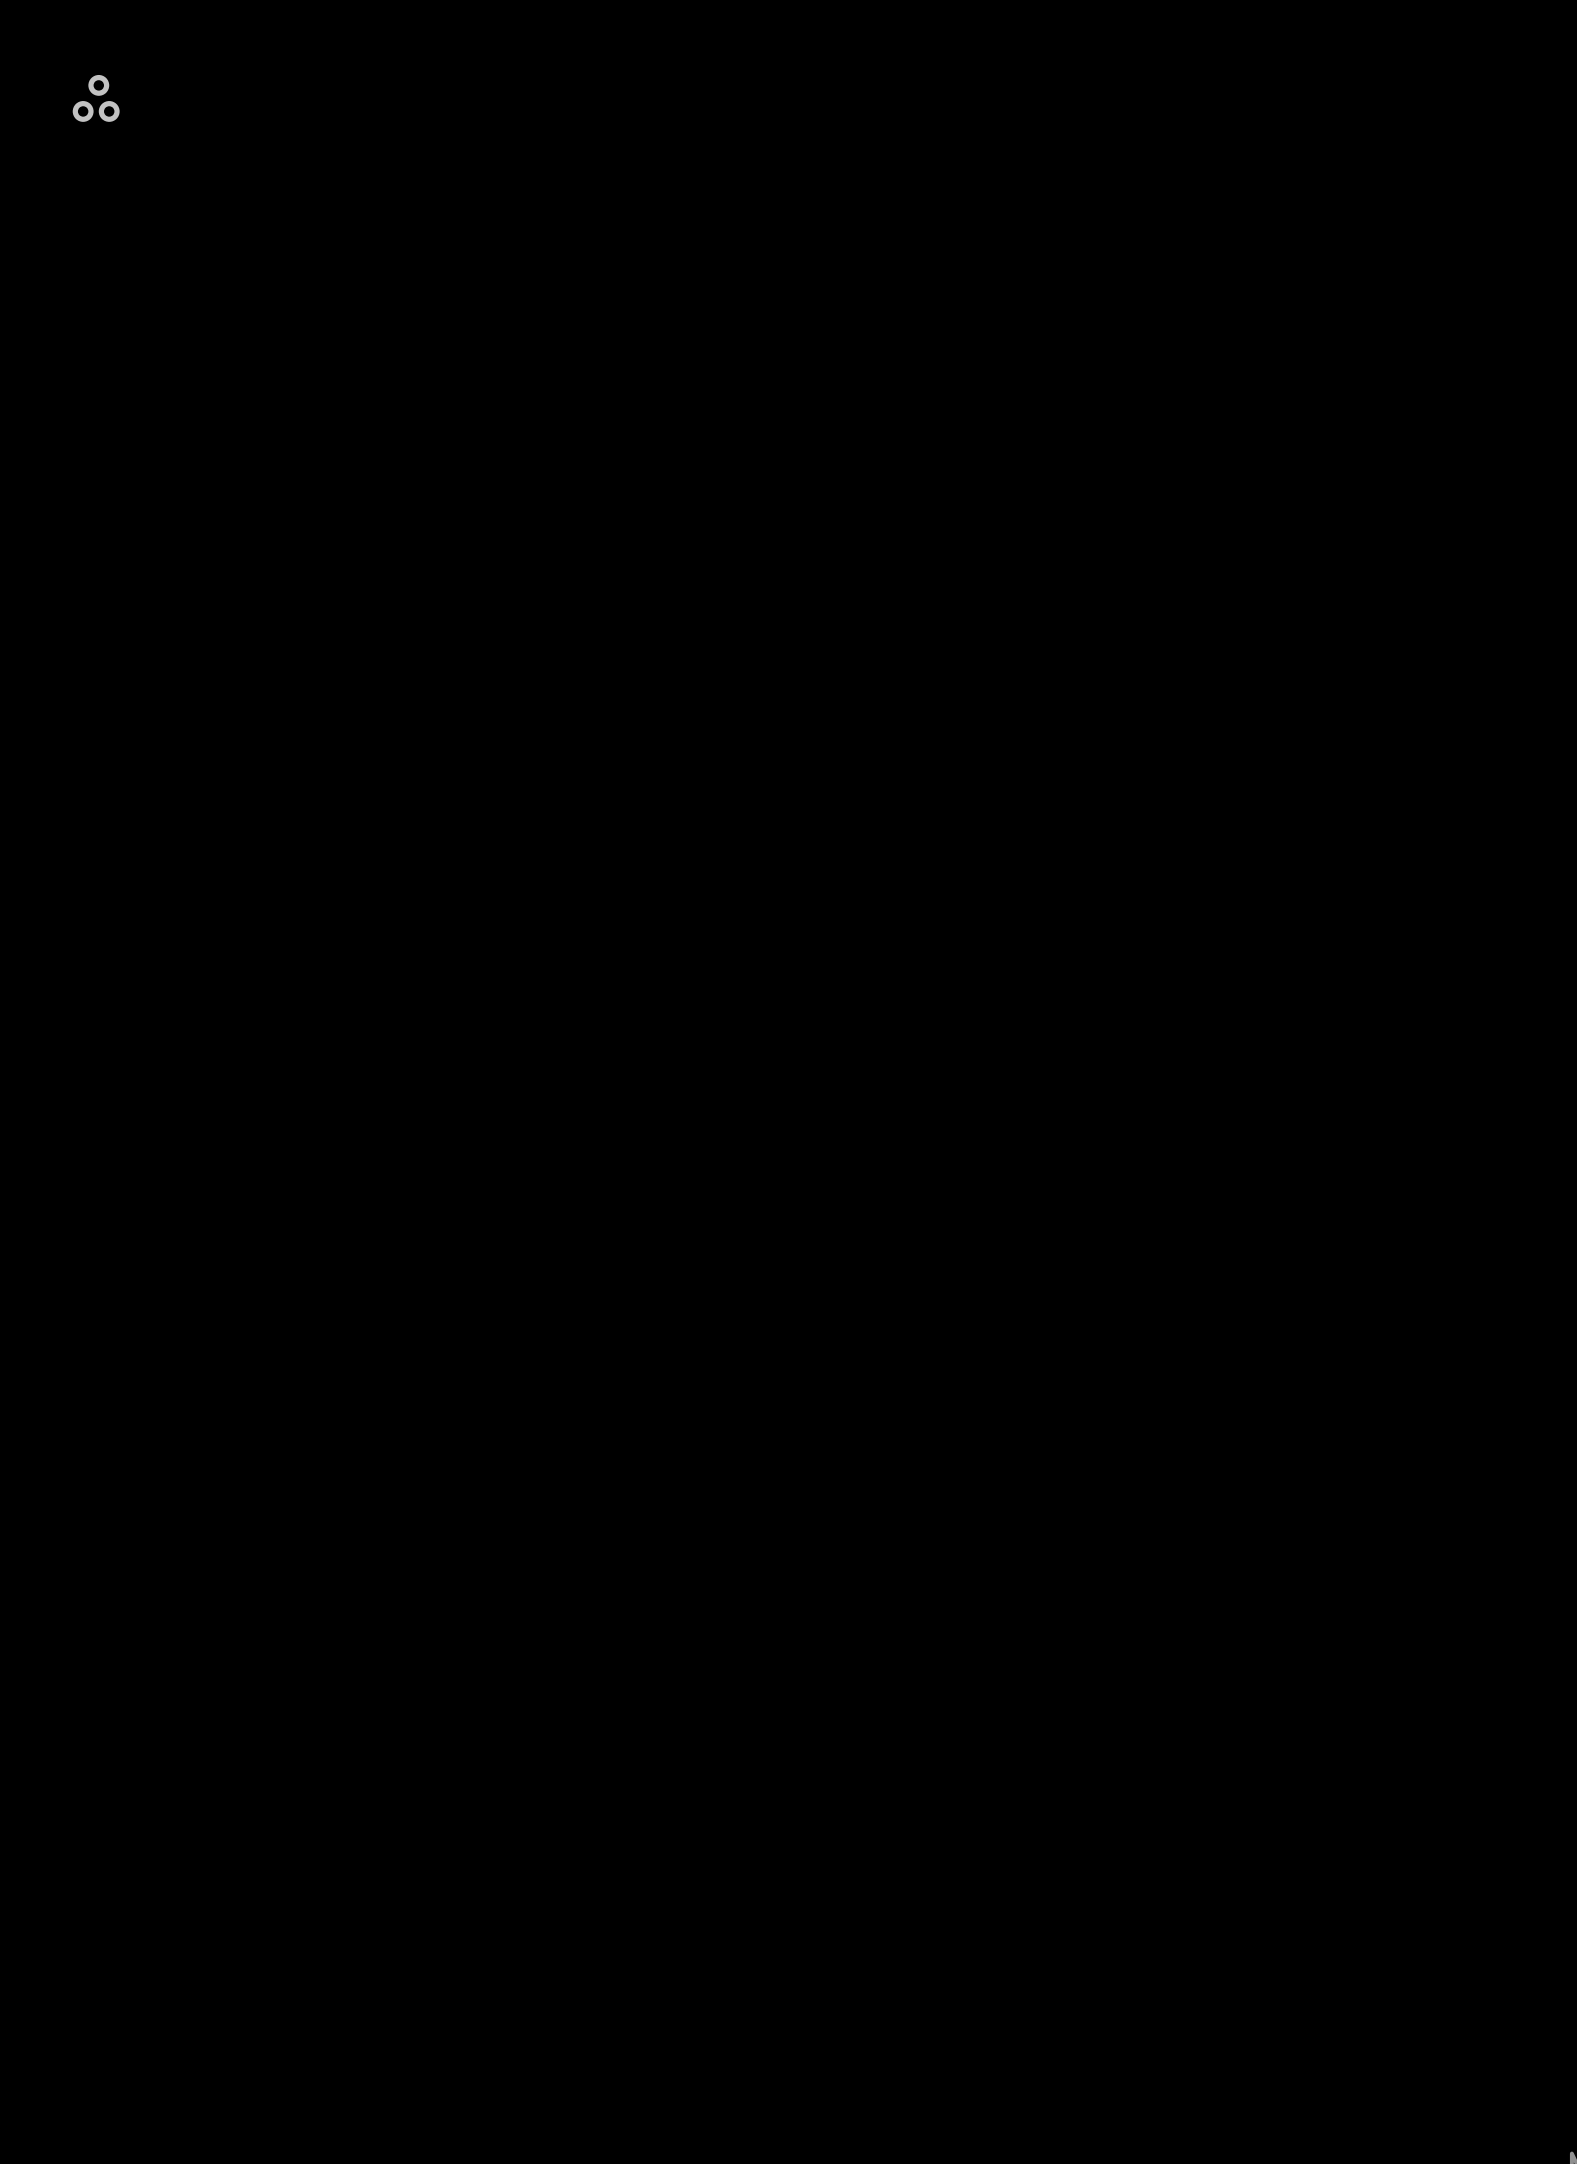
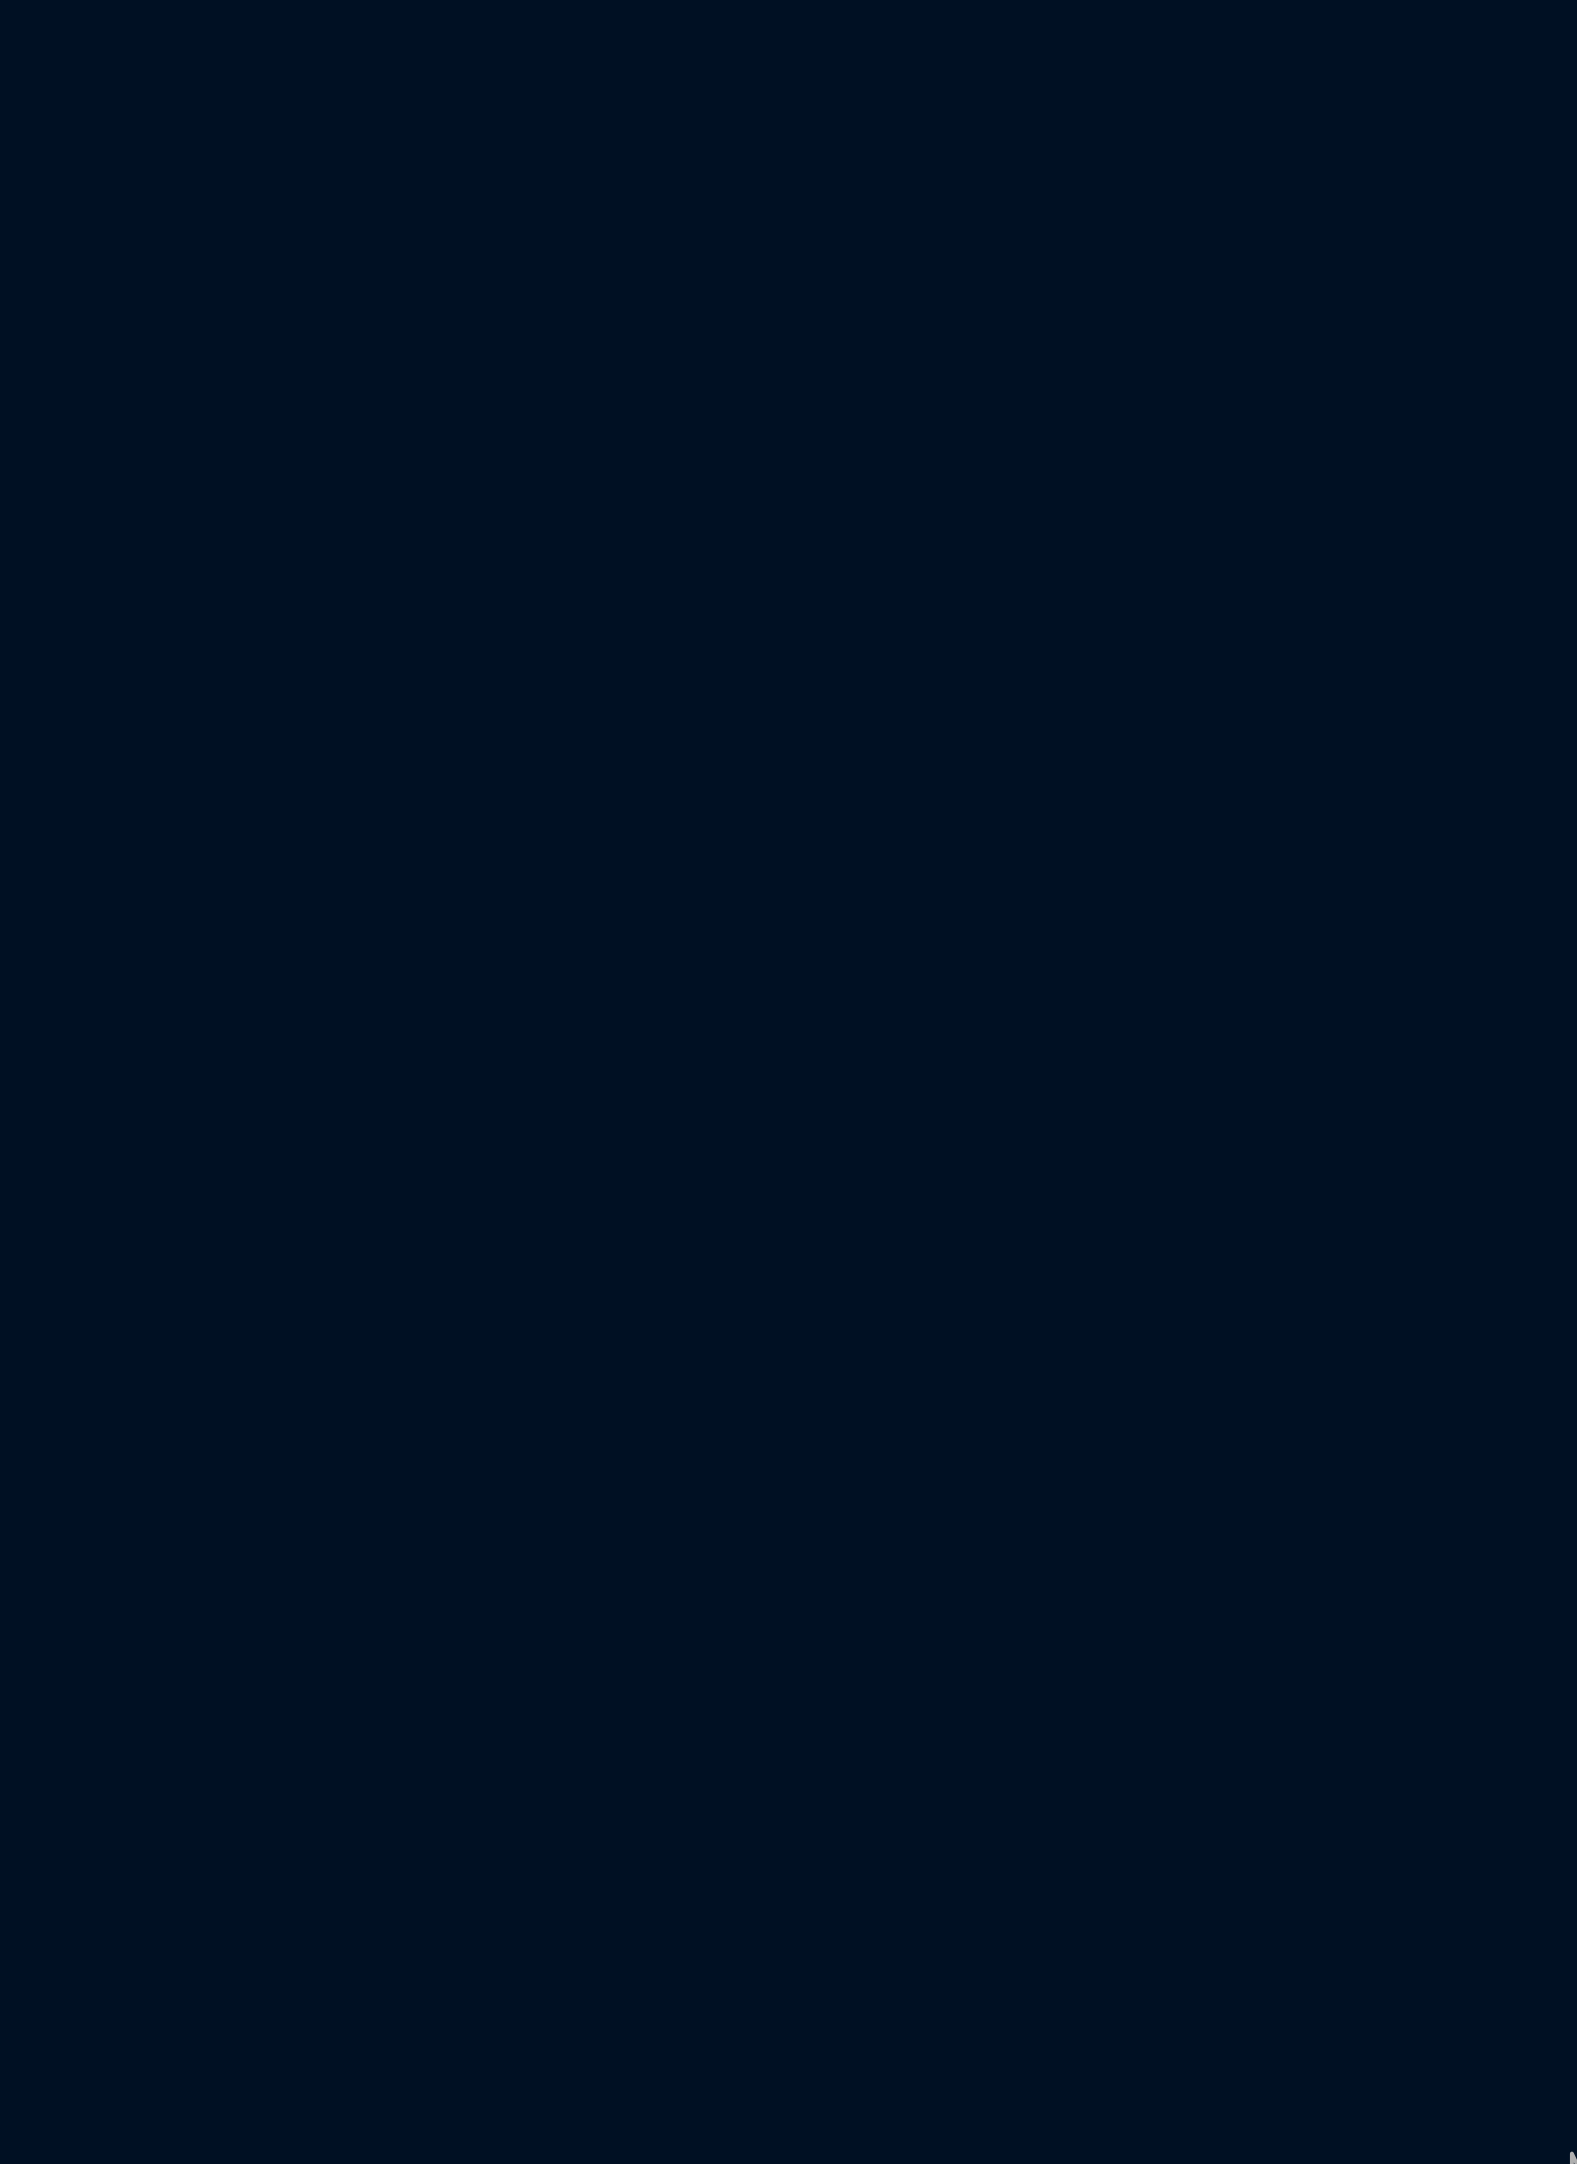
via: (98, 85) -> none
via: (83, 111) -> none
via: (109, 111) -> none

